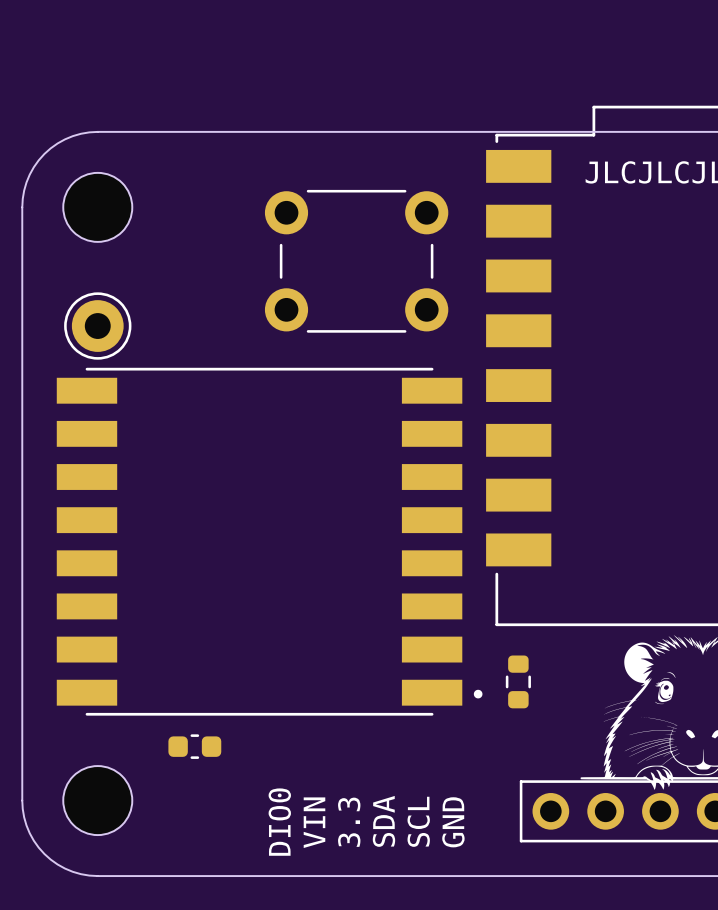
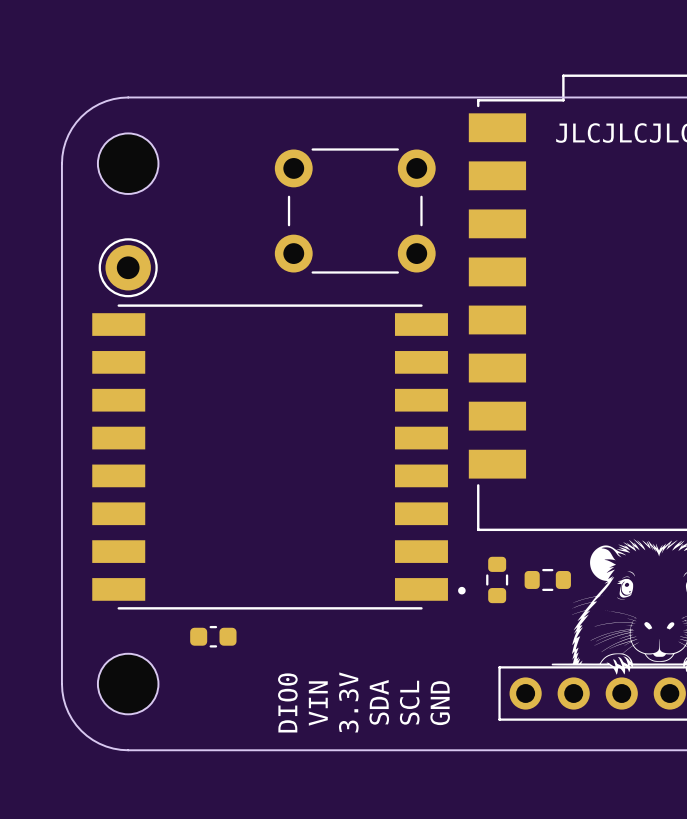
part: none -> (547, 579)
text: 3.3 (349, 822) -> 3.3V (348, 702)

